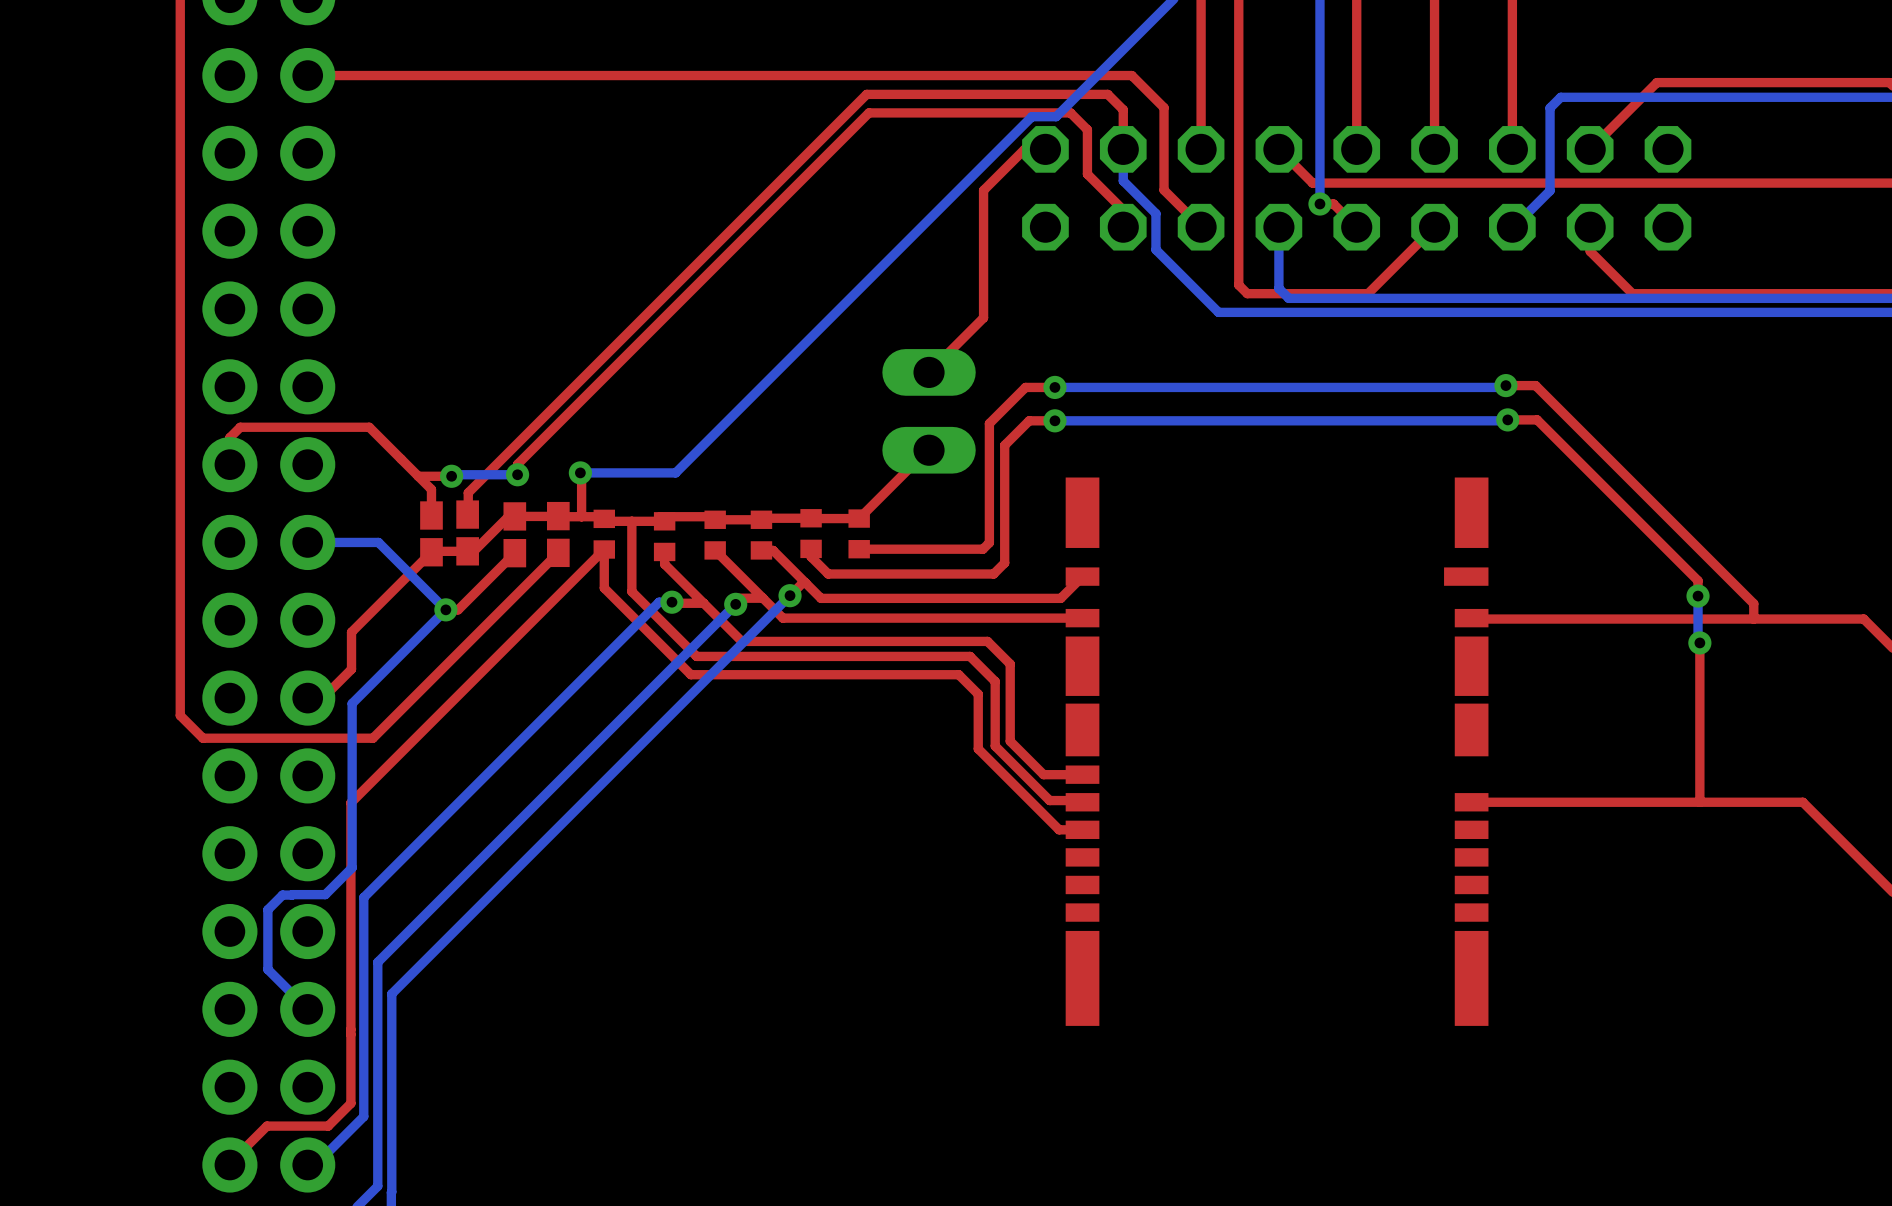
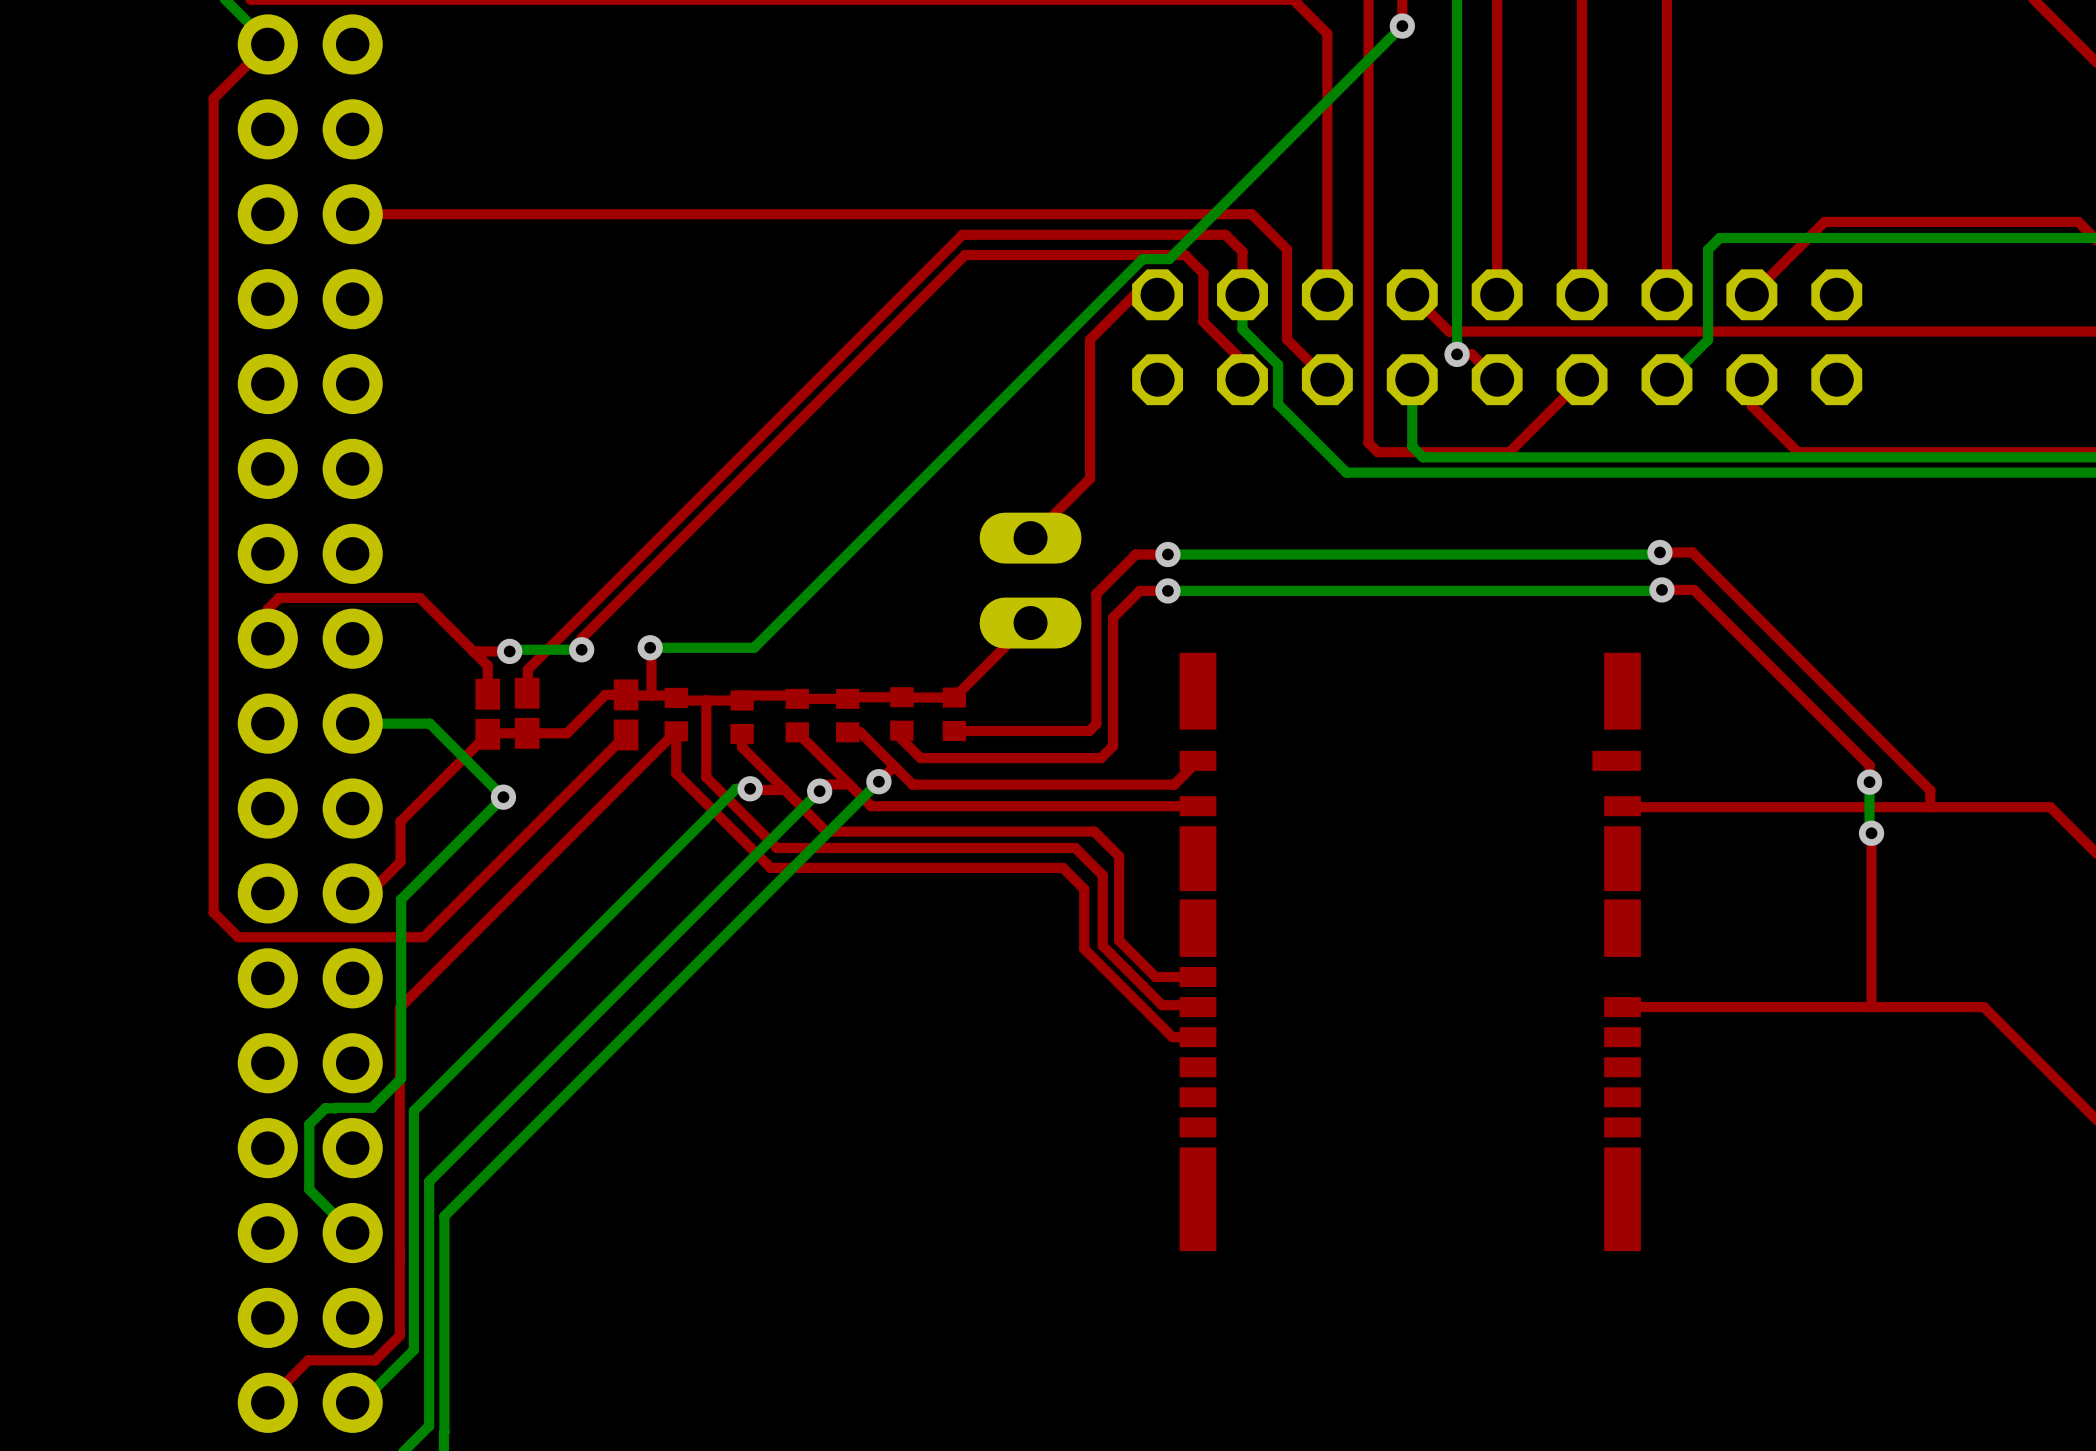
top track: (514, 516) (508, 516) (473, 551) -> (626, 694) (605, 694) (566, 733) (533, 733)
top track: (558, 516) (514, 516) -> none
part: (514, 534) -> none
top track: (514, 553) (458, 609) (445, 609) -> none

